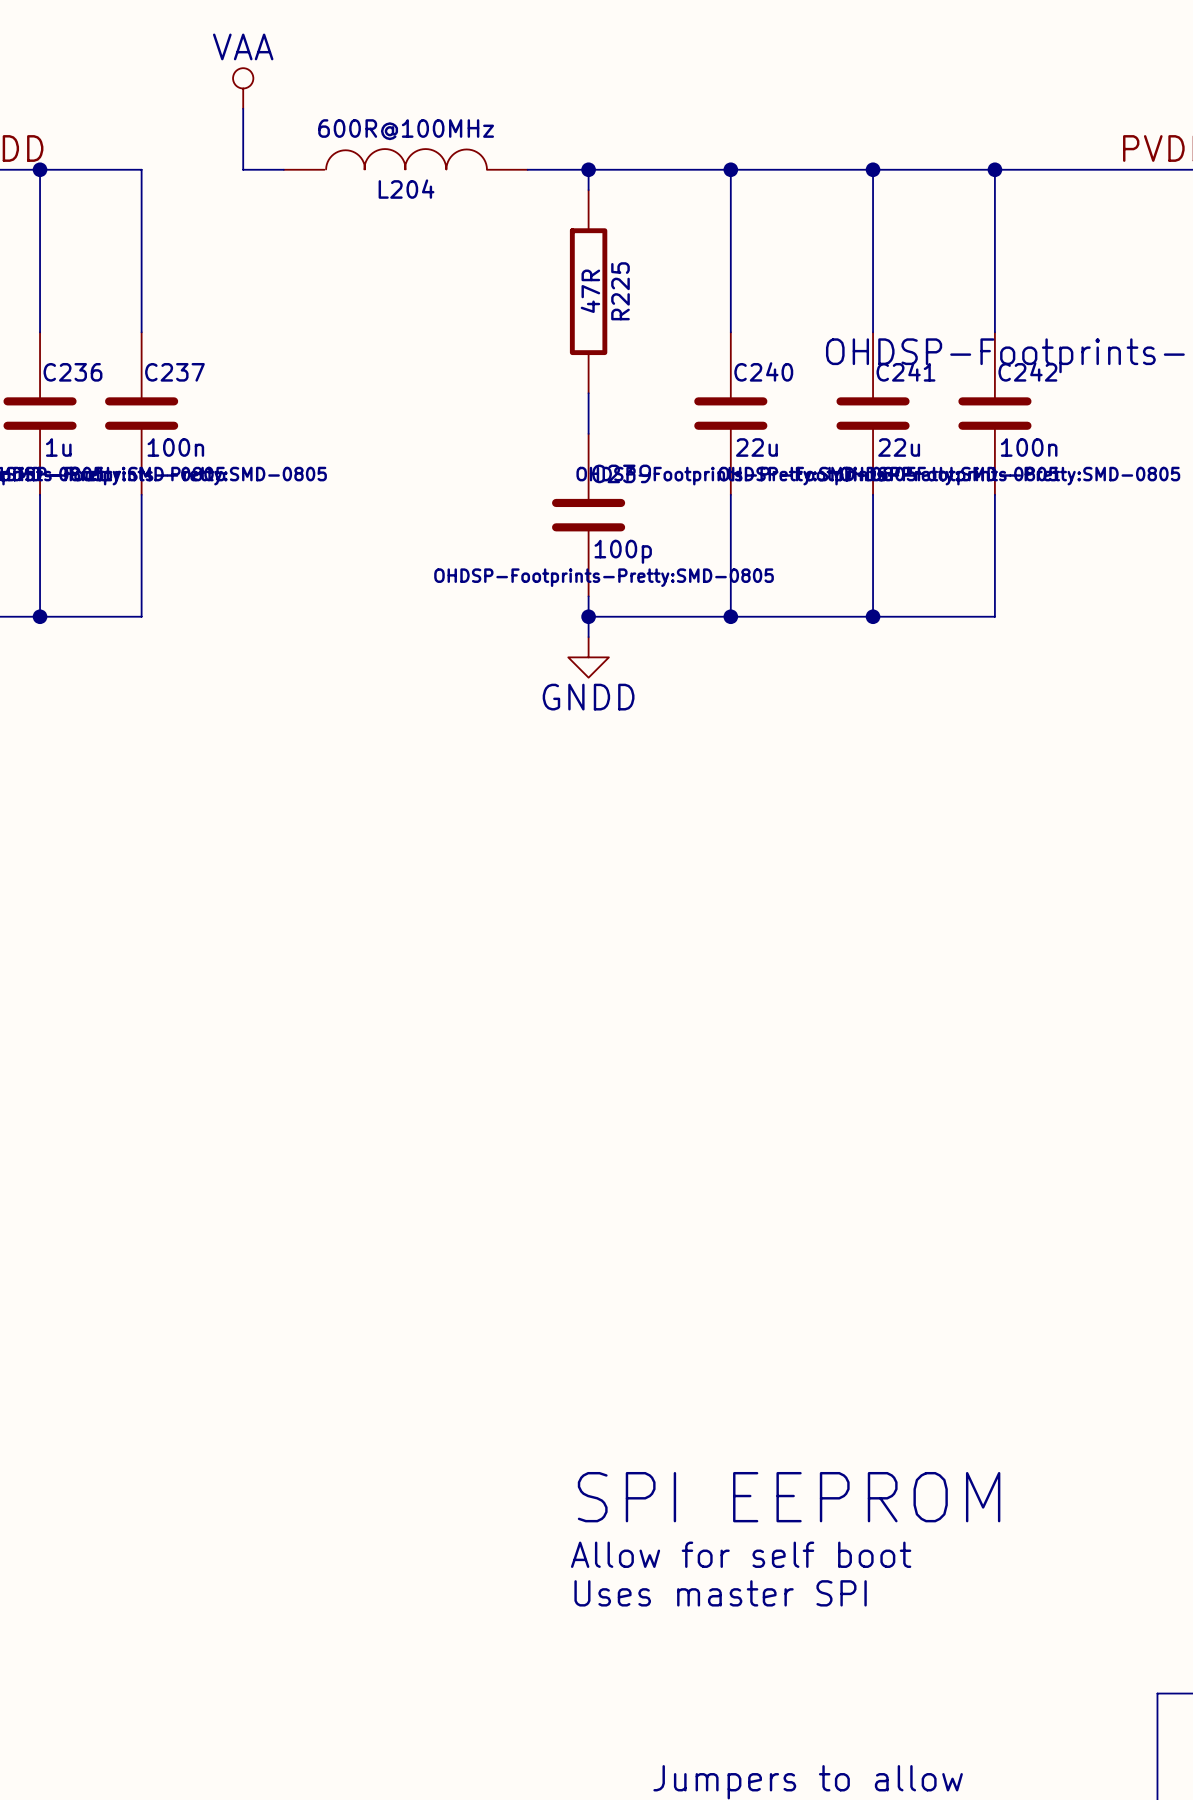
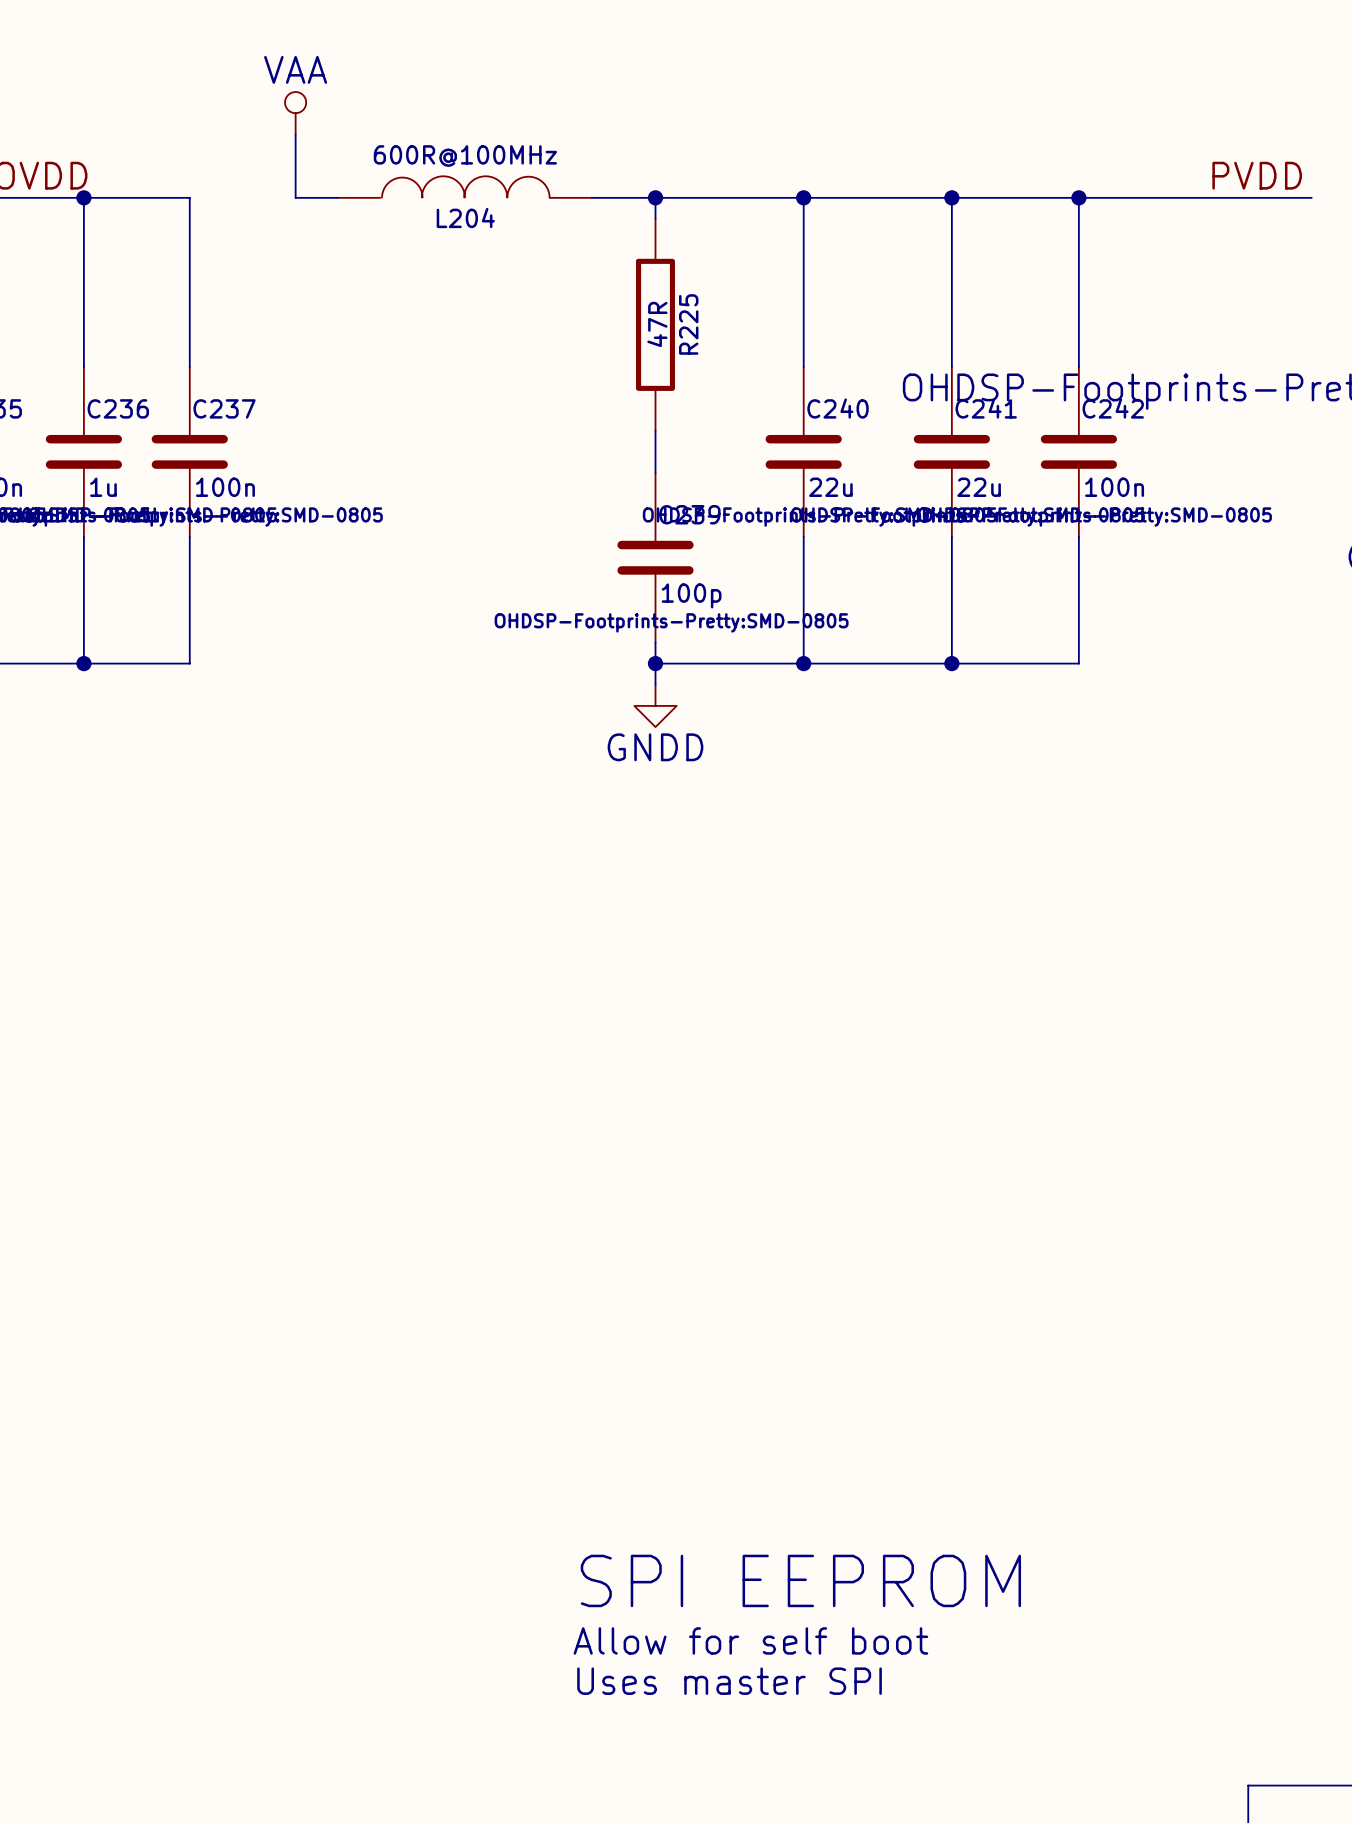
text position: SPI EEPROM (789, 1497) -> SPI EEPROM (800, 1580)
text position: Allow for self boot (741, 1554) -> Allow for self boot (750, 1640)
text position: Uses master SPI (720, 1593) -> Uses master SPI (729, 1681)

